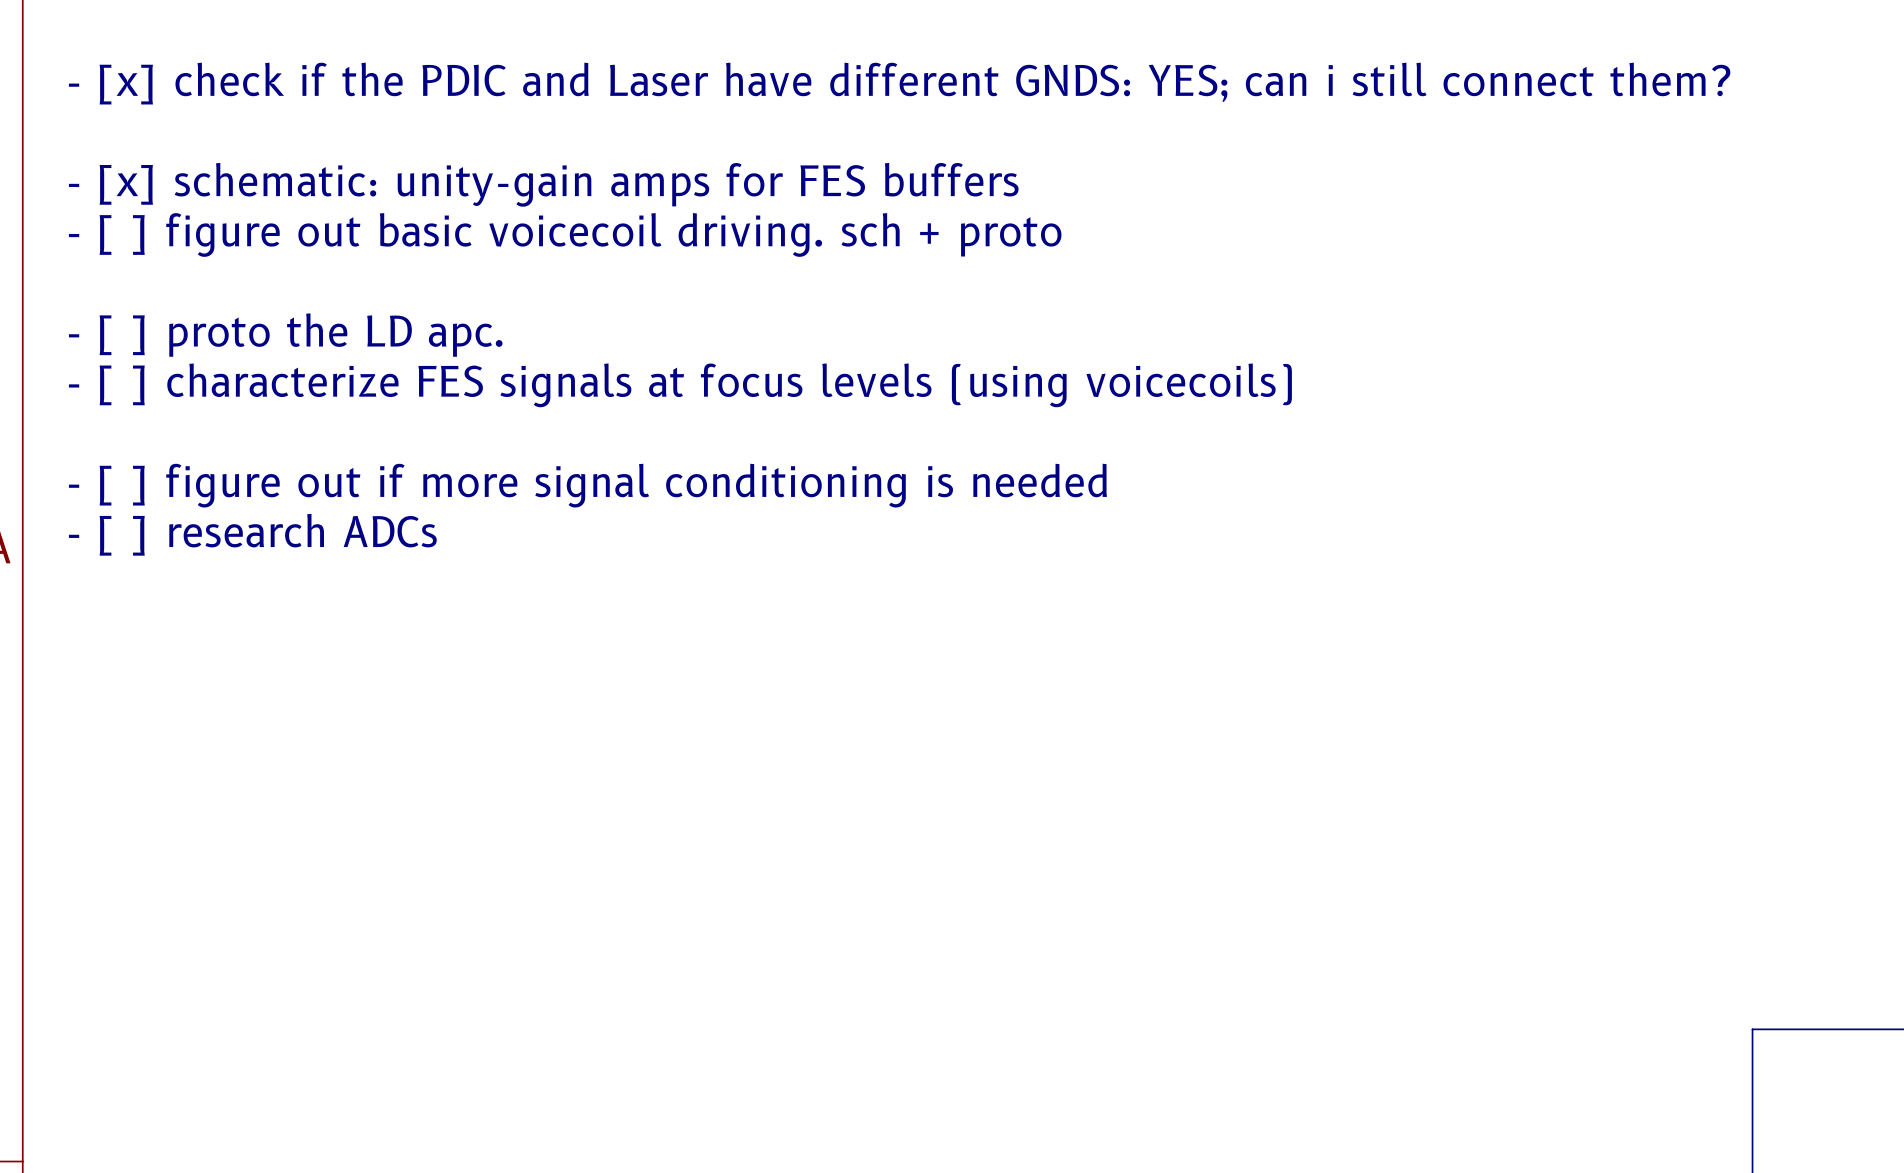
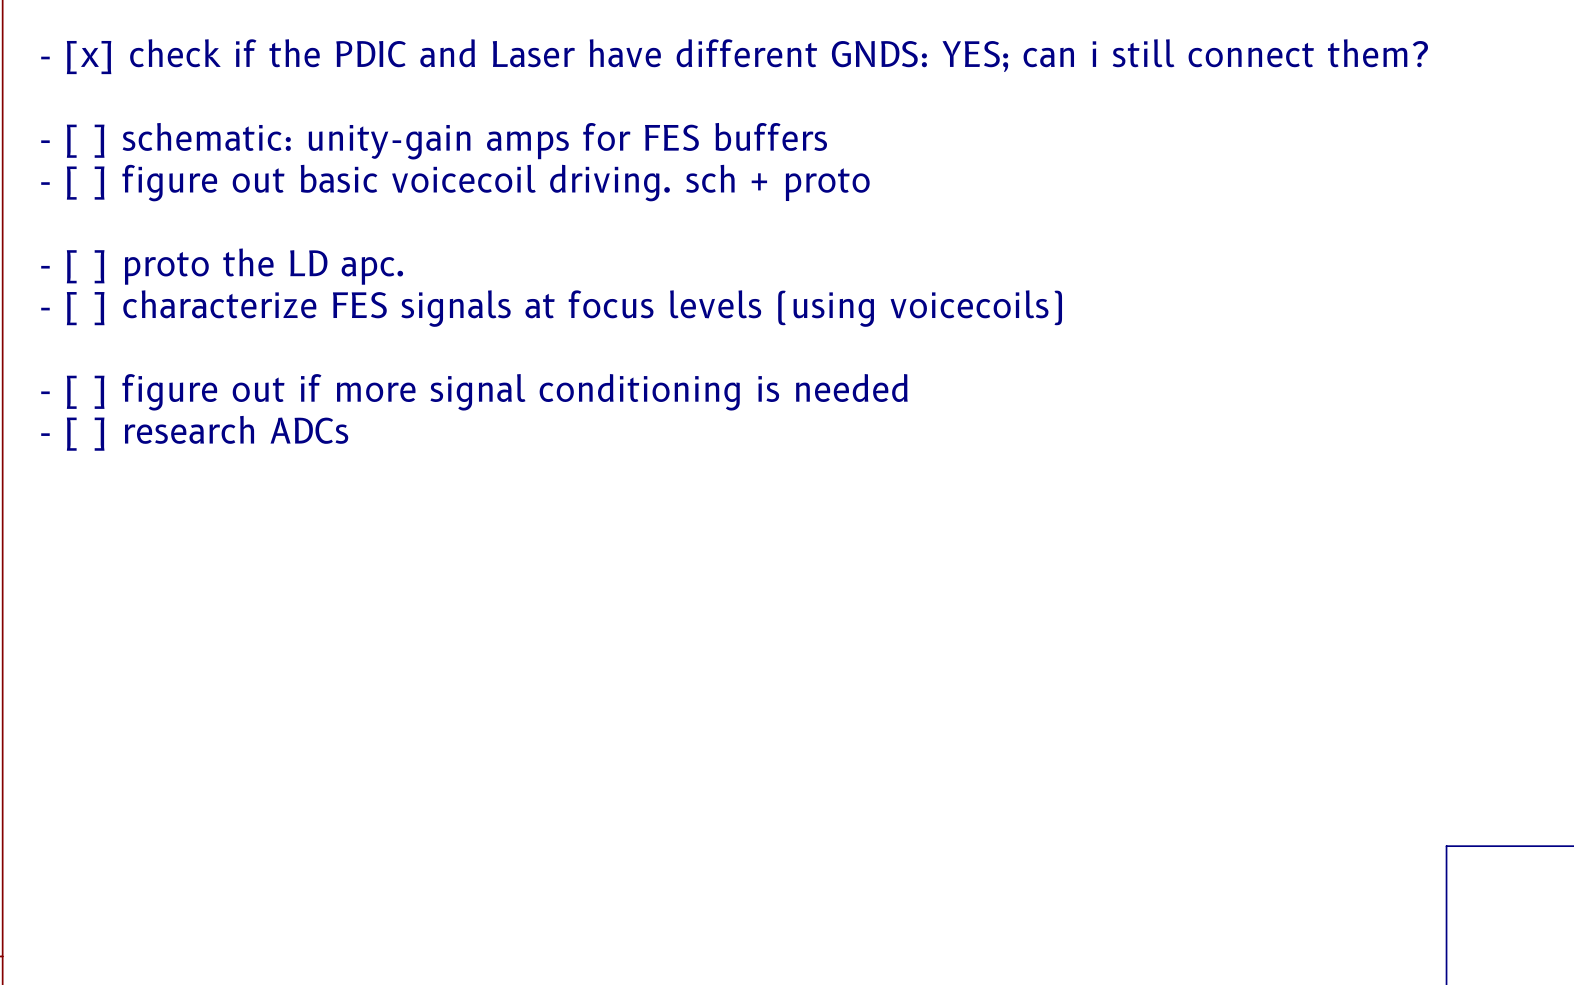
text: - [x] schematic: unity-gain amps for FES buffers (543, 184) -> - [ ] schematic: unity-gain amps for FES buffers (434, 141)

